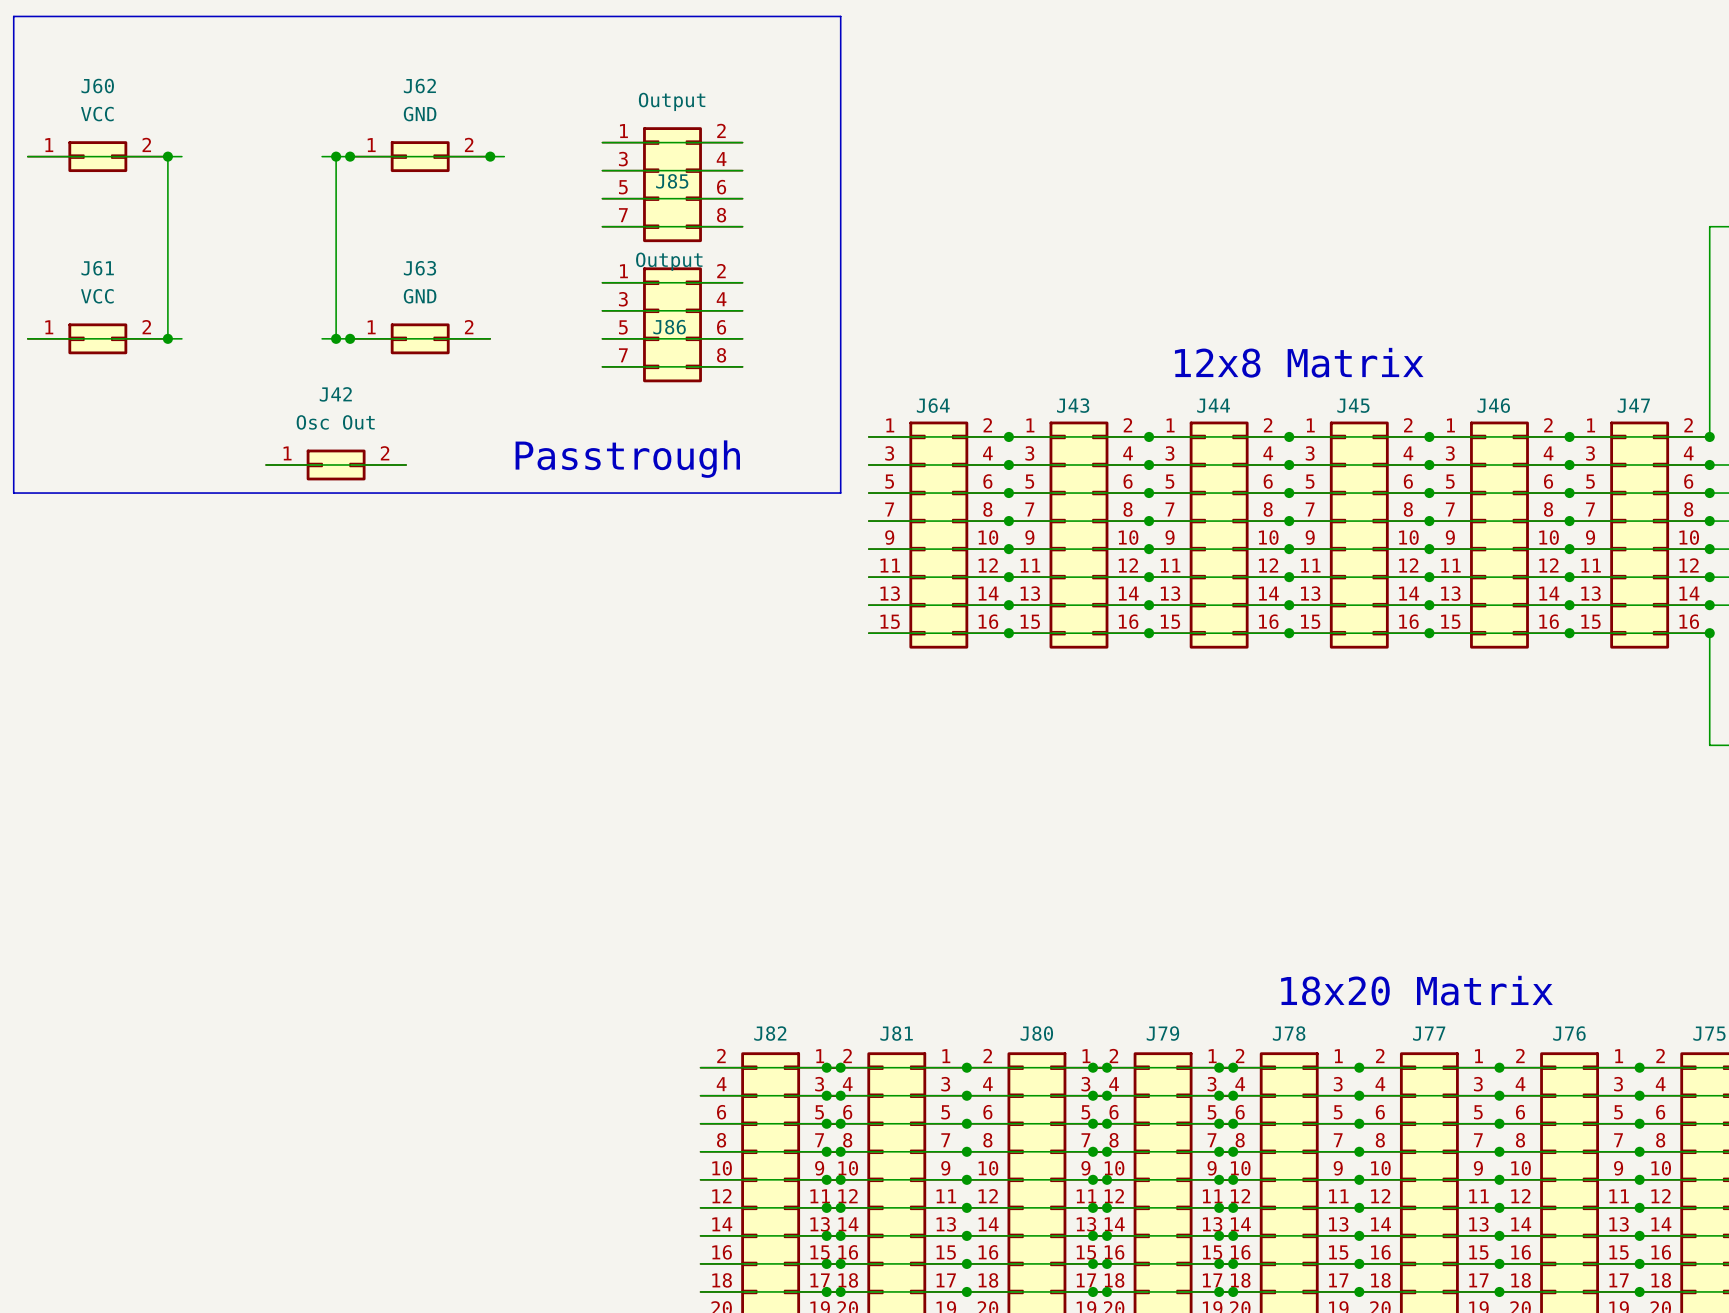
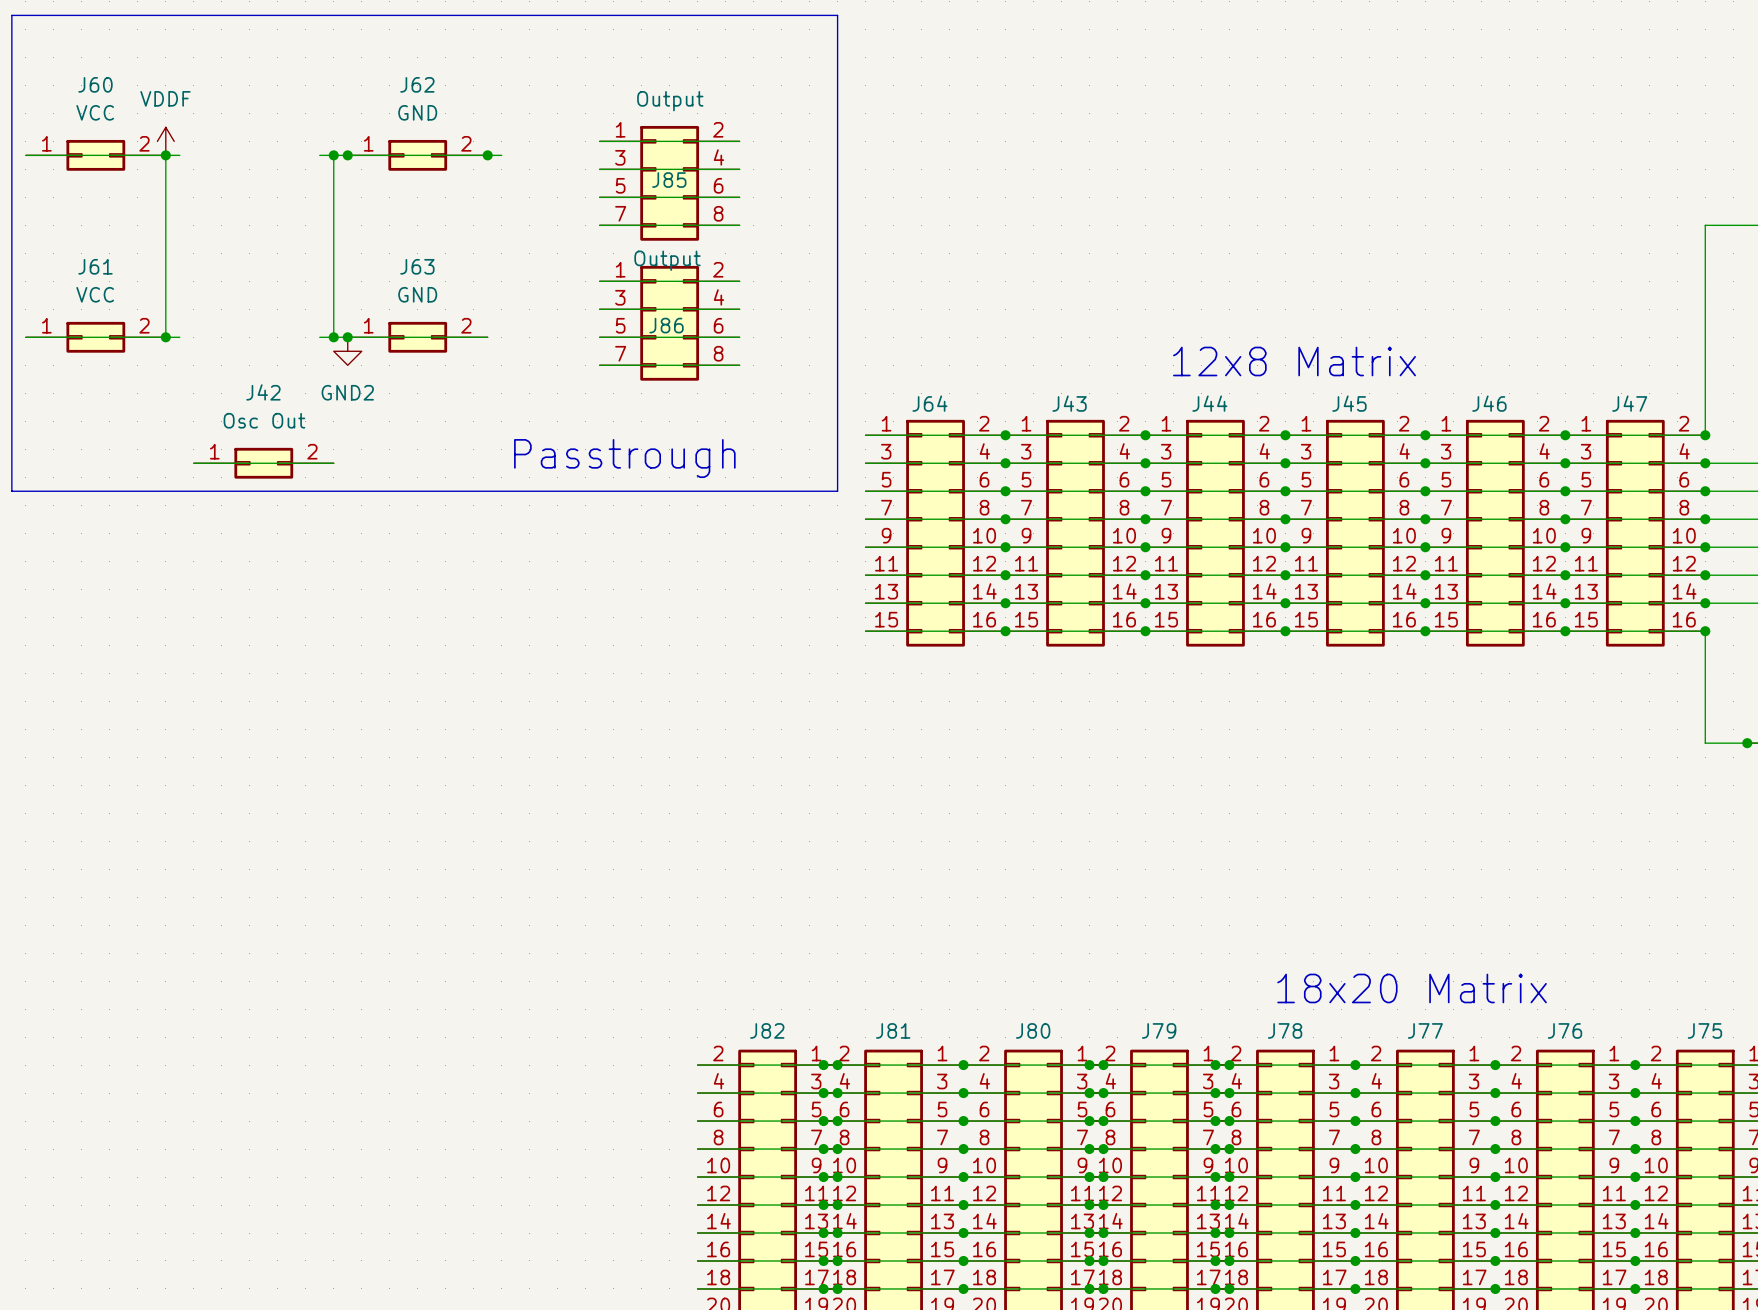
power symbol: none -> VDDF (165, 141)
power symbol: none -> GND2 (347, 351)
wire: (336, 464) (406, 464) -> (193, 463) (263, 463)
J42 position: (336, 464) -> (263, 463)

